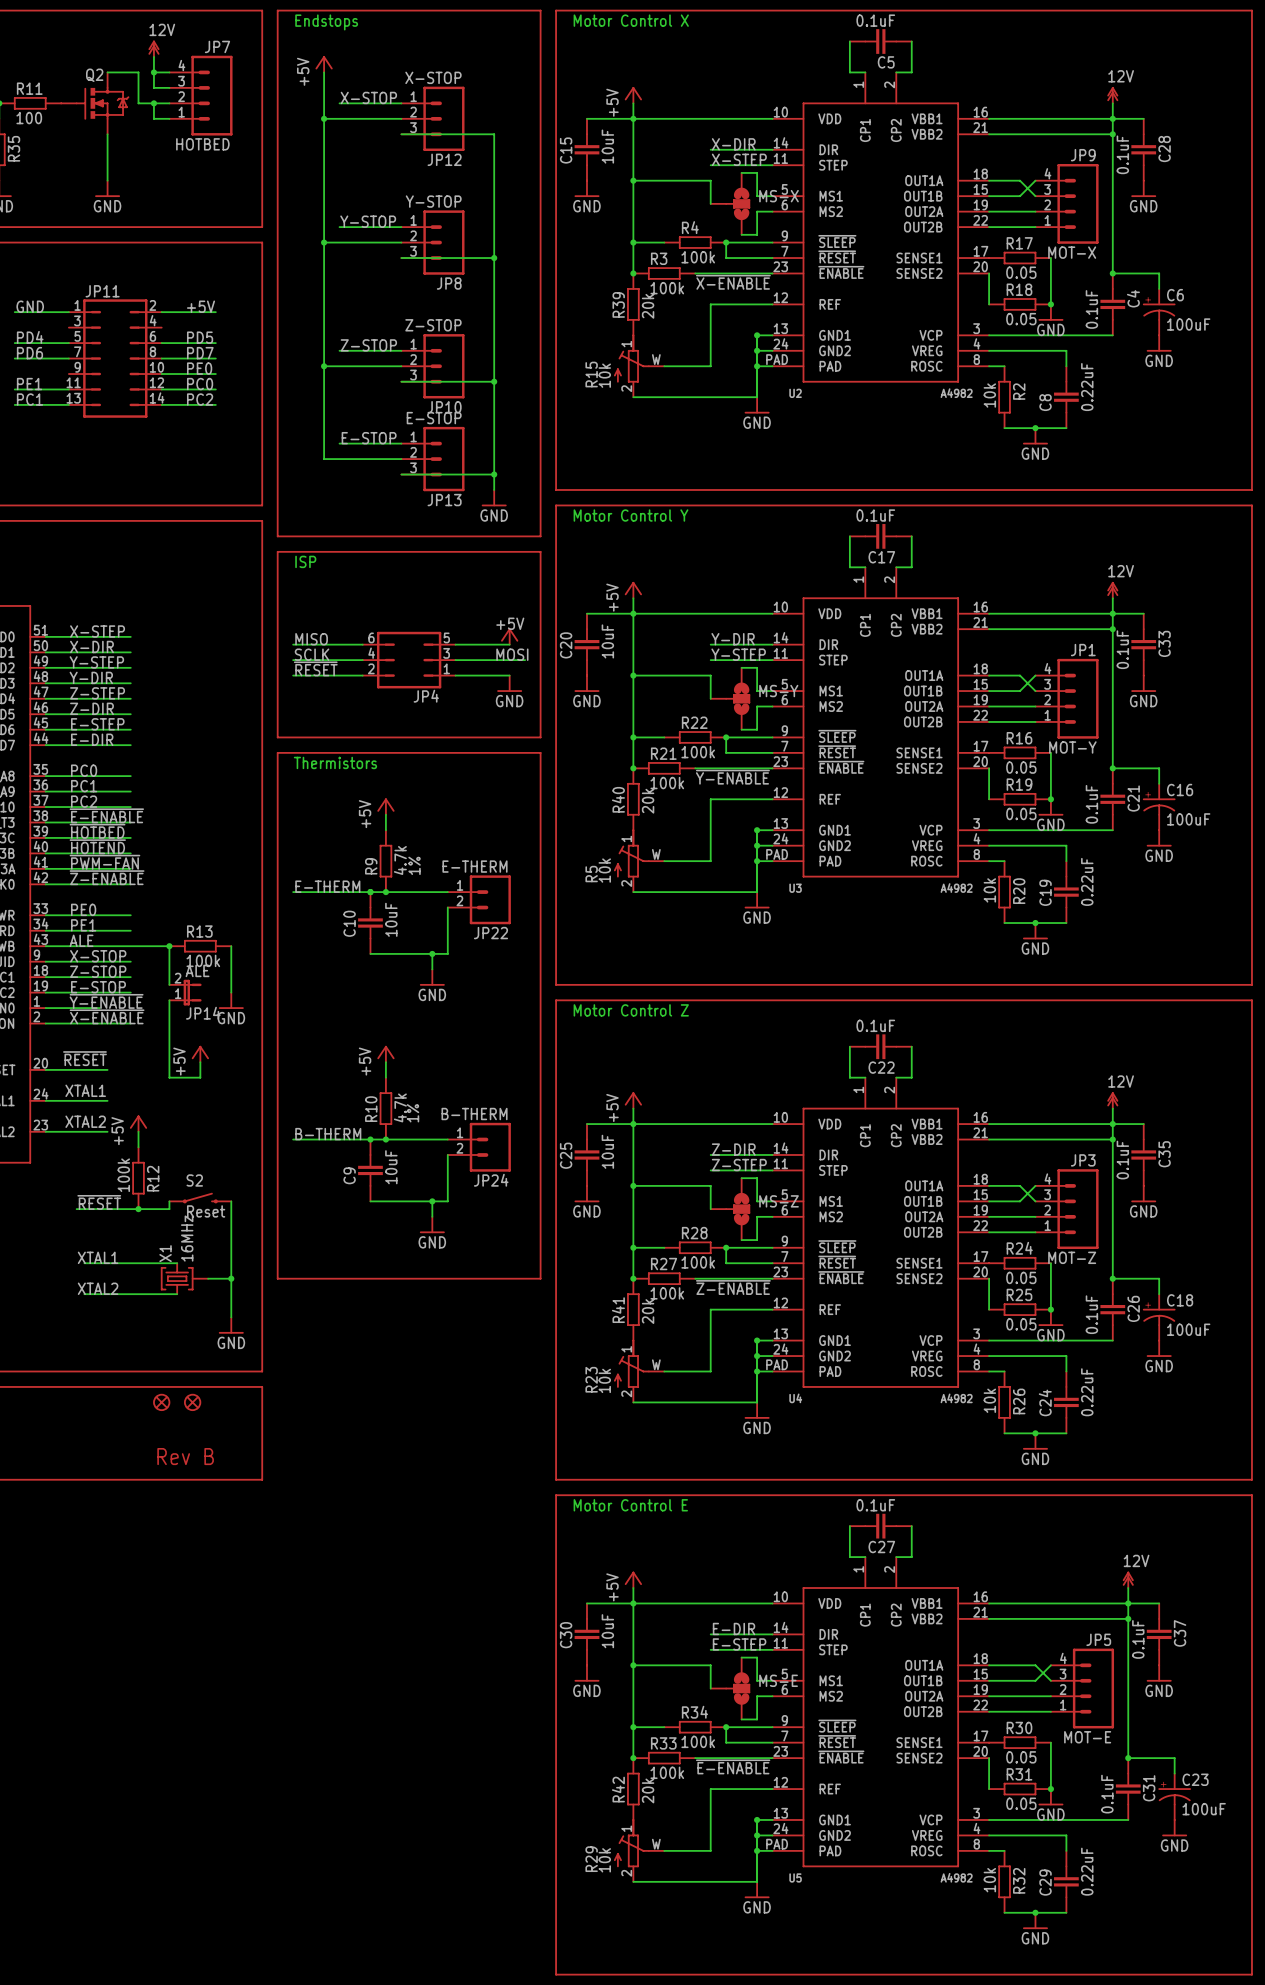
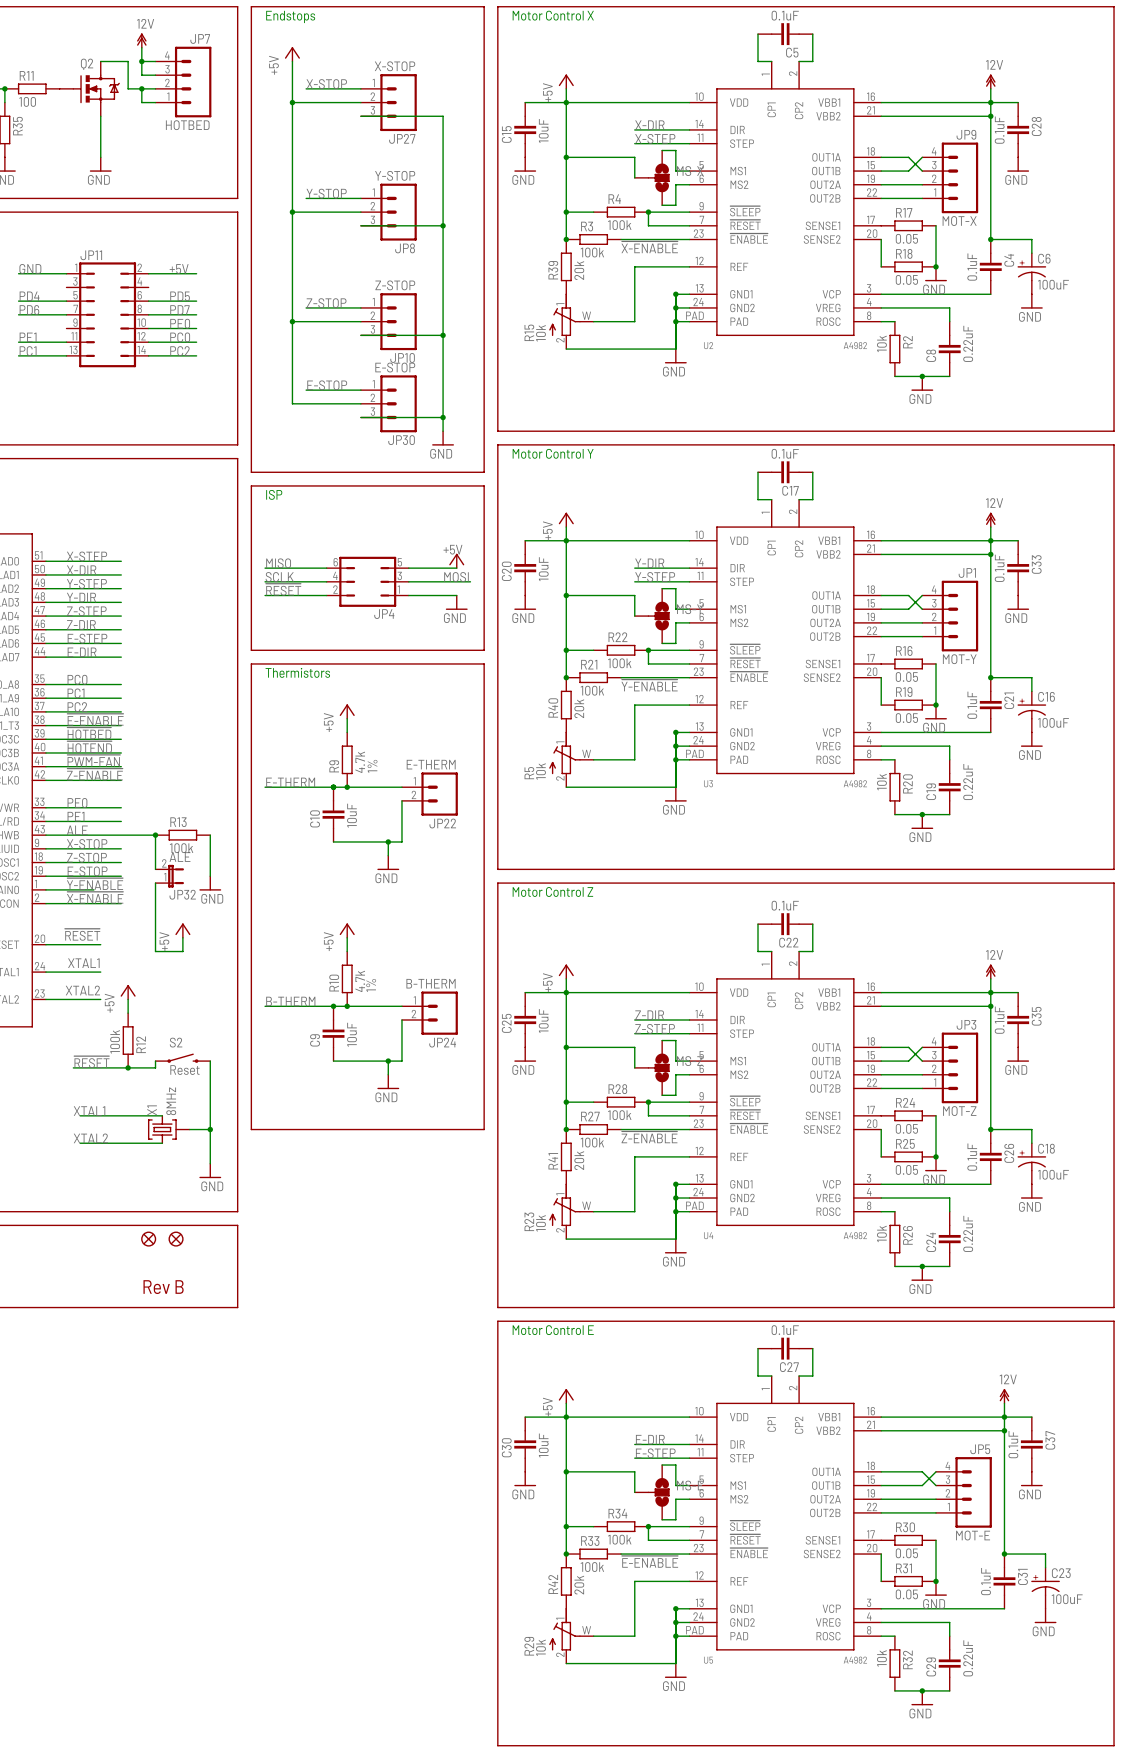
JP12 name: JP12 (444, 159) -> JP27 (402, 138)
JP13 name: JP13 (444, 500) -> JP30 (401, 440)
JP14 name: JP14 (203, 1013) -> JP32 (182, 894)
X1 value: 16MHz (187, 1238) -> 8MHz (171, 1101)

